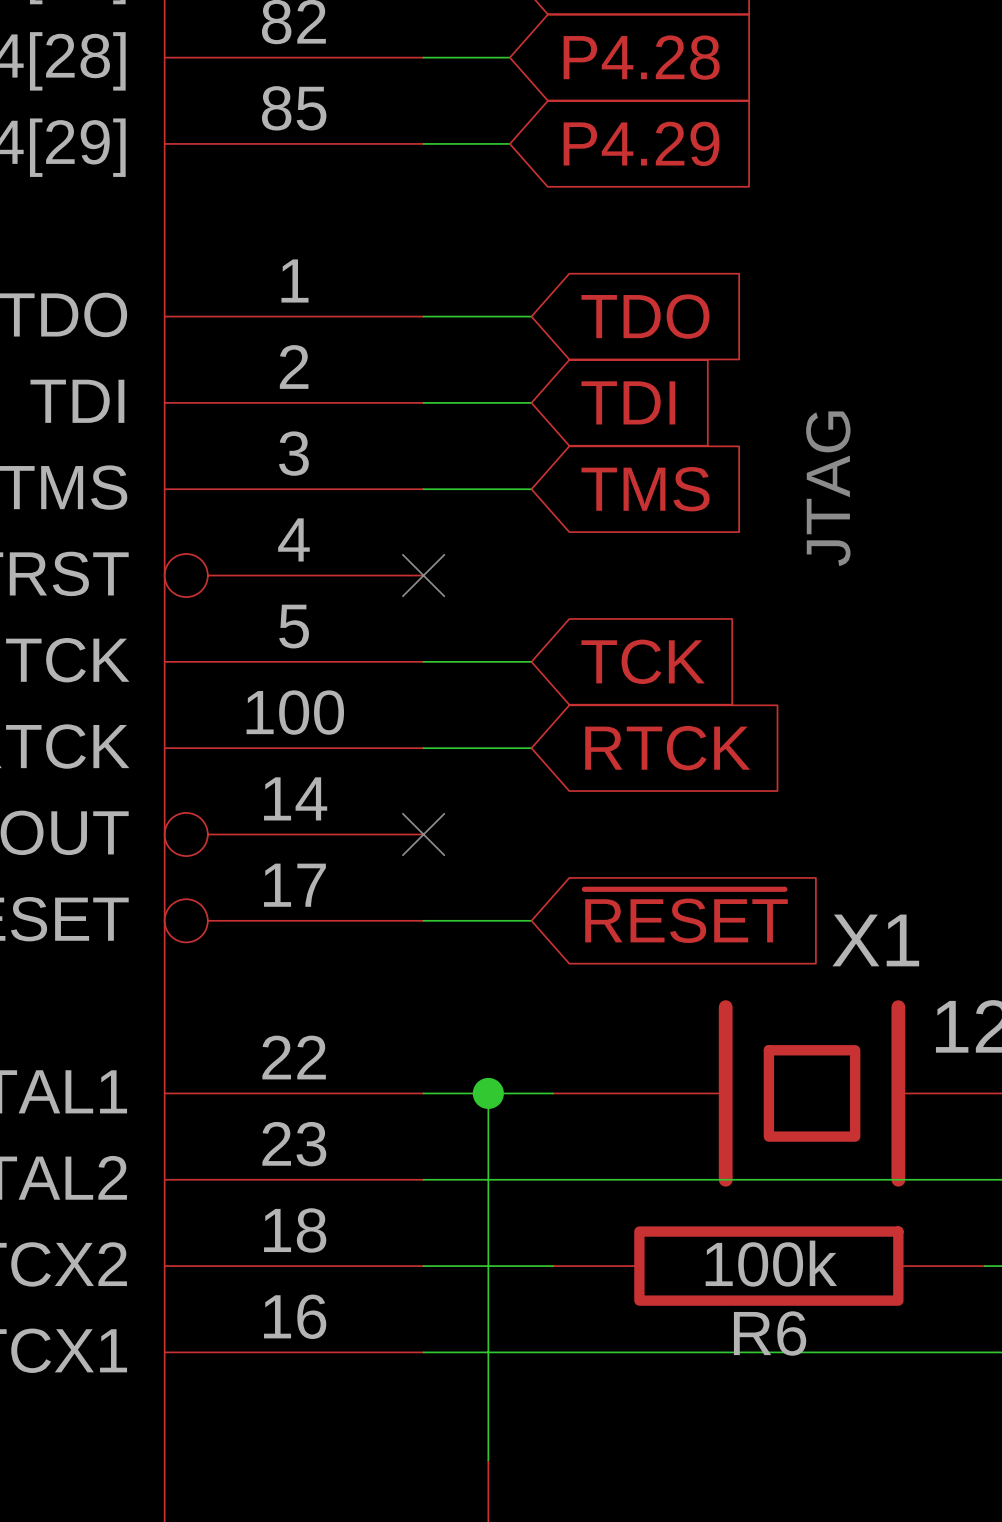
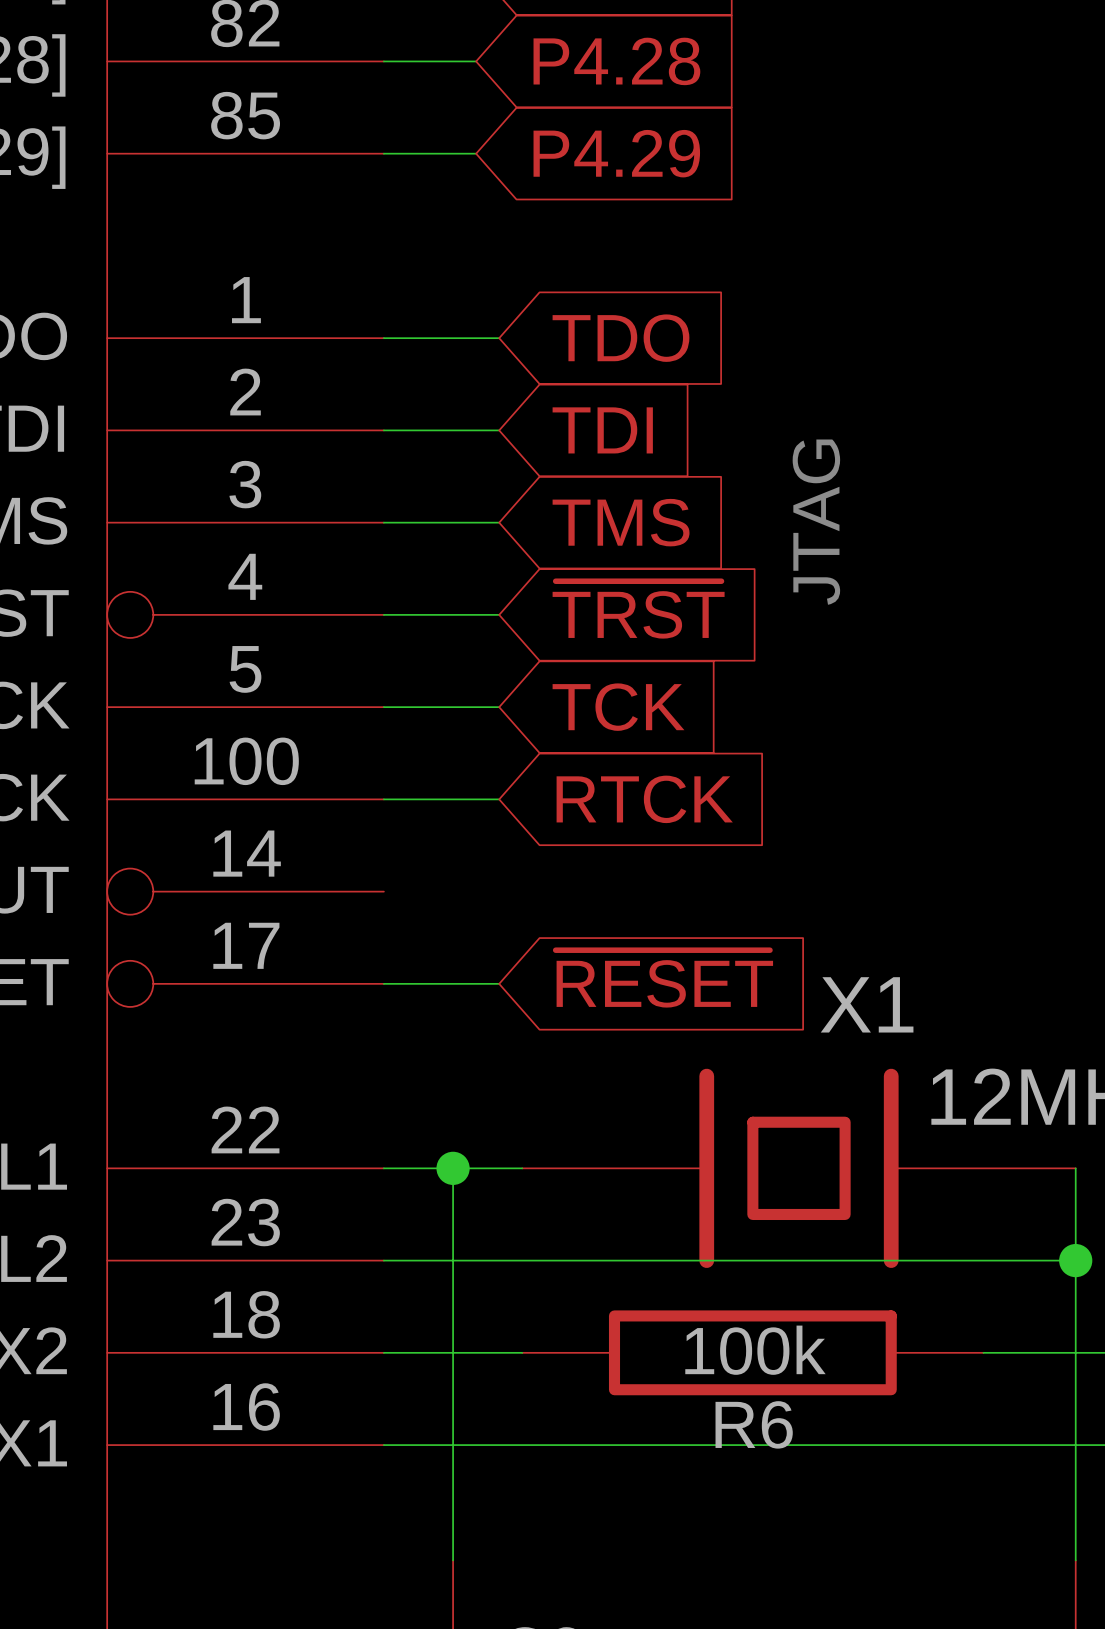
global label: none -> ~{TRST} (638, 609)
wire: none -> (383, 614) (499, 614)
no-connect mark: (423, 575) -> none
no-connect mark: (423, 834) -> none

